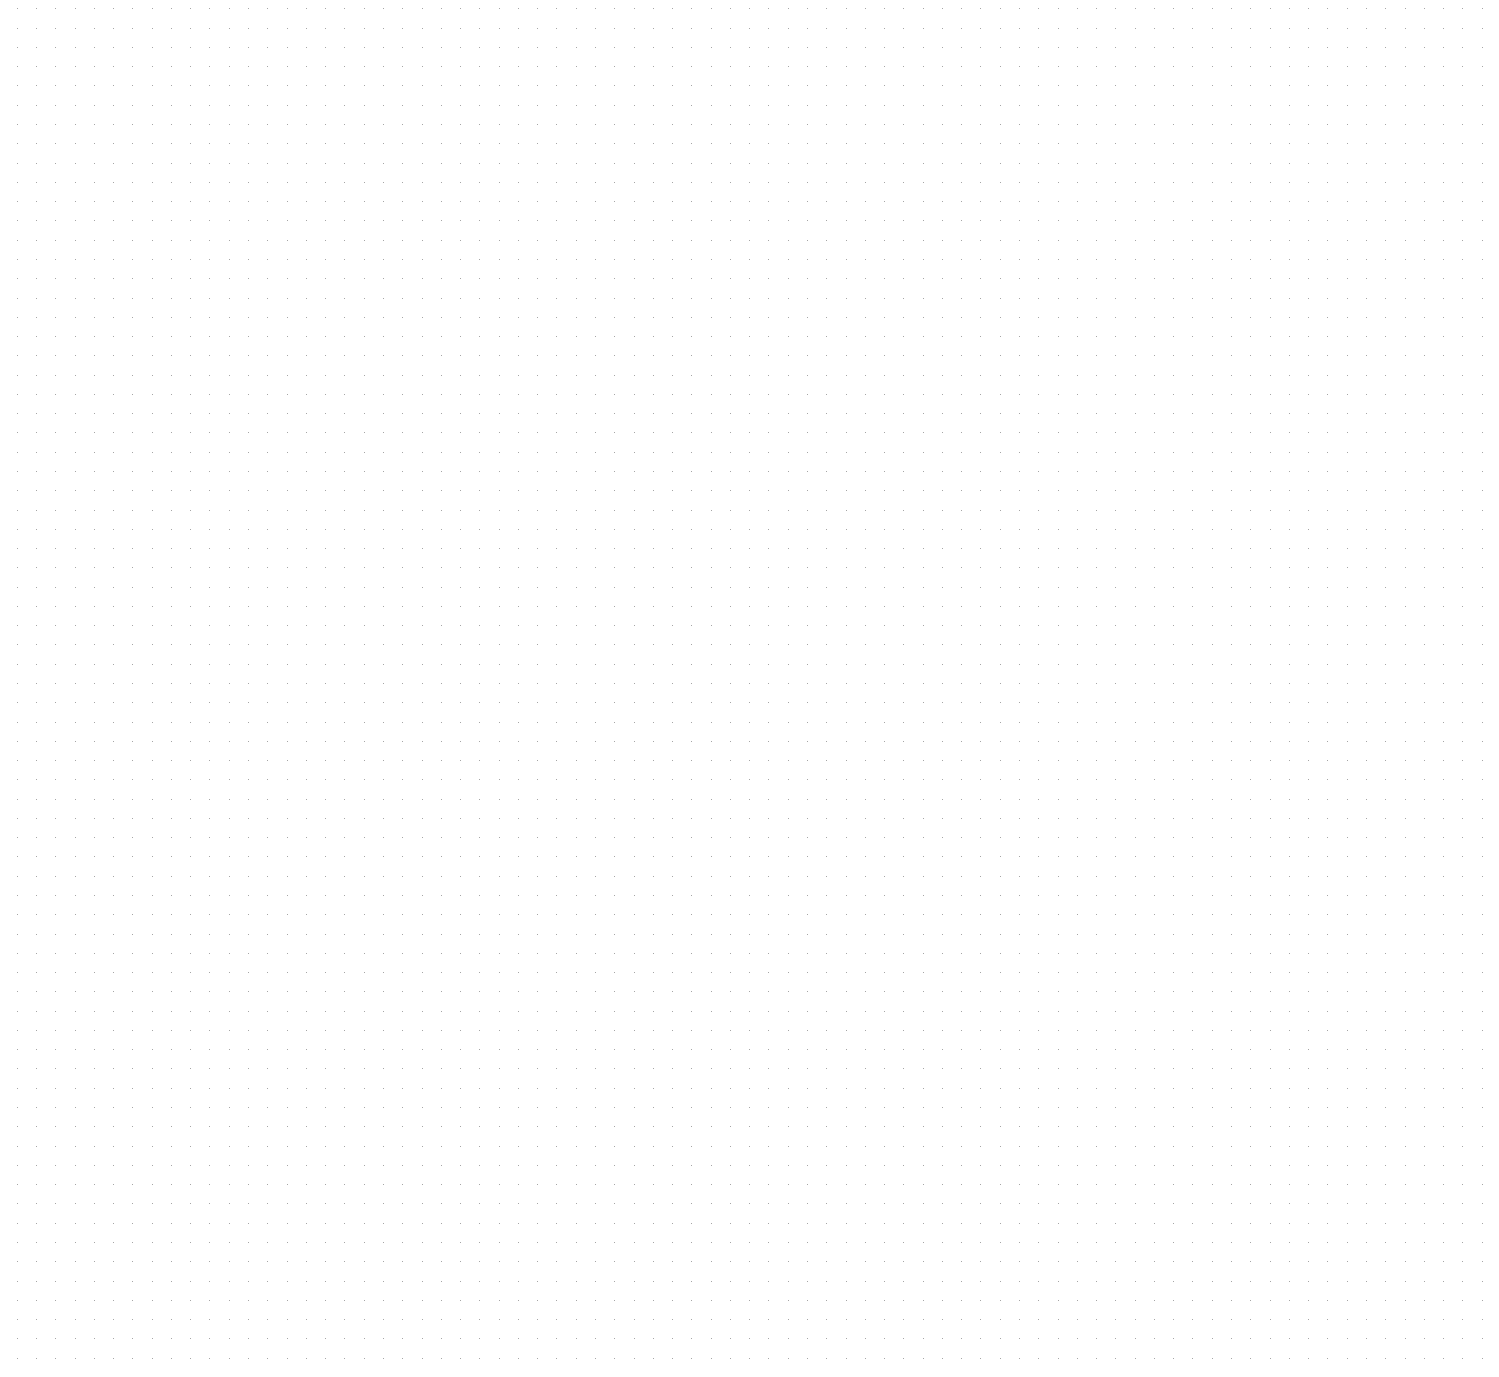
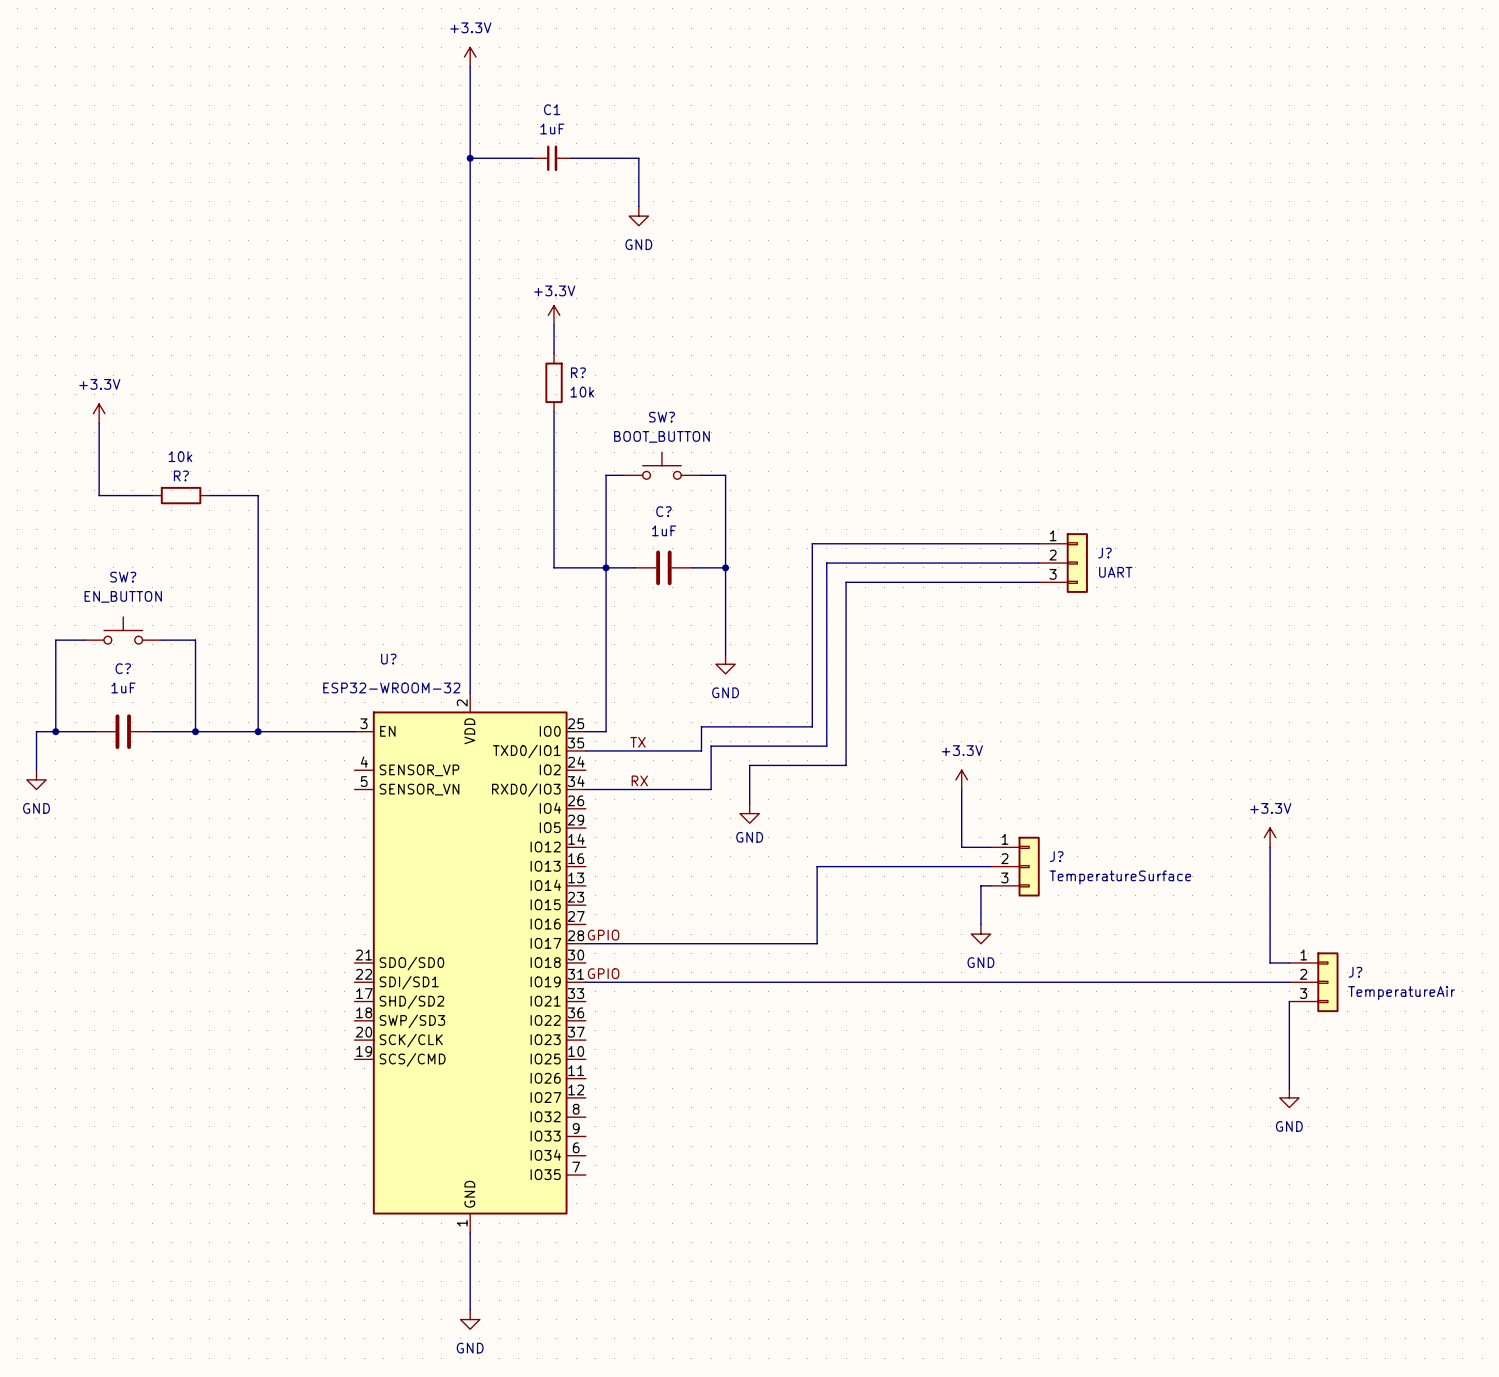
power symbol: none -> +3.3V (470, 57)
wire: none -> (470, 66) (470, 693)
wire: none -> (470, 158) (532, 158)
junction: none -> (470, 158)
C1: none -> 1uF (552, 158)
wire: none -> (571, 158) (638, 158) (638, 206)
power symbol: none -> GND (638, 216)
power symbol: none -> +3.3V (554, 315)
wire: none -> (554, 325) (554, 353)
R?: none -> 10k (554, 382)
wire: none -> (554, 411) (554, 567) (634, 567)
power symbol: none -> +3.3V (99, 413)
wire: none -> (99, 423) (99, 495) (152, 495)
SW?: none -> BOOT_BUTTON (661, 465)
wire: none -> (623, 475) (606, 475) (606, 731) (585, 731)
wire: none -> (700, 475) (725, 475) (725, 654)
R?: none -> 10k (181, 495)
wire: none -> (209, 495) (258, 495) (258, 731)
wire: none -> (1038, 543) (812, 543) (812, 726) (701, 726) (701, 750) (585, 750)
wire: none -> (1038, 563) (826, 563) (826, 746) (711, 746) (711, 789) (585, 789)
J?: none -> UART (1063, 563)
junction: none -> (606, 567)
C?: none -> 1uF (663, 567)
wire: none -> (692, 567) (725, 567)
junction: none -> (725, 567)
wire: none -> (1038, 582) (846, 582) (846, 765) (749, 765) (749, 803)
SW?: none -> EN_BUTTON (123, 630)
wire: none -> (84, 640) (55, 640) (55, 731)
wire: none -> (161, 640) (195, 640) (195, 731)
power symbol: none -> GND (725, 664)
junction: none -> (55, 731)
wire: none -> (94, 731) (36, 731) (36, 770)
C?: none -> 1uF (123, 731)
wire: none -> (152, 731) (354, 731)
junction: none -> (195, 731)
junction: none -> (258, 731)
label: none -> TX (637, 742)
power symbol: none -> GND (36, 779)
power symbol: none -> +3.3V (961, 779)
label: none -> RX (639, 780)
wire: none -> (961, 789) (961, 847) (990, 847)
power symbol: none -> GND (749, 813)
power symbol: none -> +3.3V (1270, 837)
wire: none -> (1270, 847) (1270, 962) (1289, 962)
wire: none -> (990, 866) (817, 866) (817, 943) (585, 943)
J?: none -> TemperatureSurface (1015, 866)
wire: none -> (990, 885) (980, 885) (980, 924)
power symbol: none -> GND (980, 934)
label: none -> GPIO (603, 935)
U?: none -> ESP32-WROOM-32 (470, 962)
label: none -> GPIO (603, 973)
wire: none -> (585, 982) (1289, 982)
J?: none -> TemperatureAir (1313, 982)
wire: none -> (1289, 1001) (1289, 1088)
power symbol: none -> GND (1289, 1097)
wire: none -> (470, 1232) (470, 1309)
power symbol: none -> GND (470, 1319)

